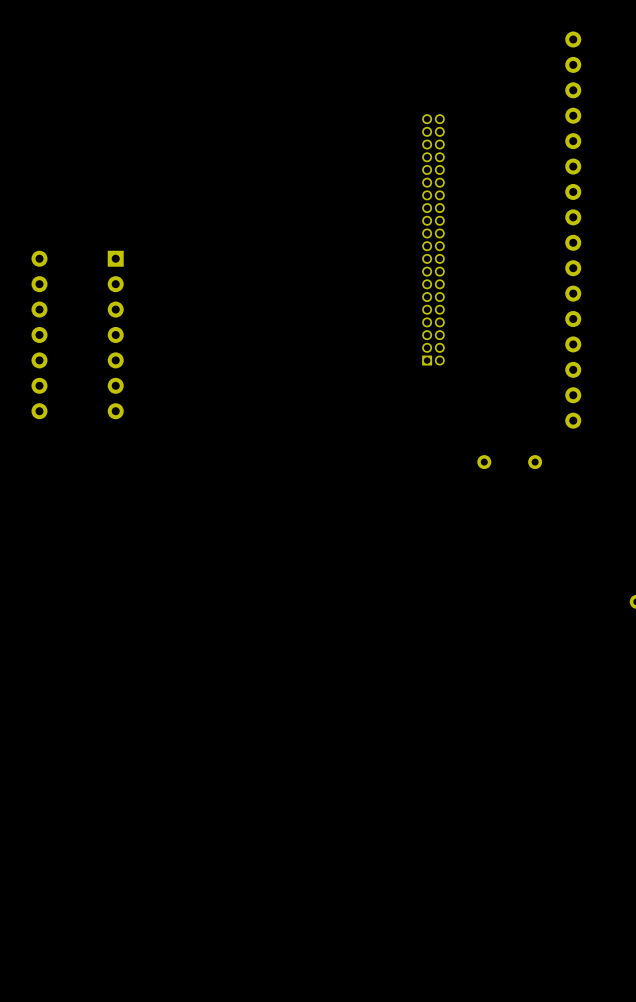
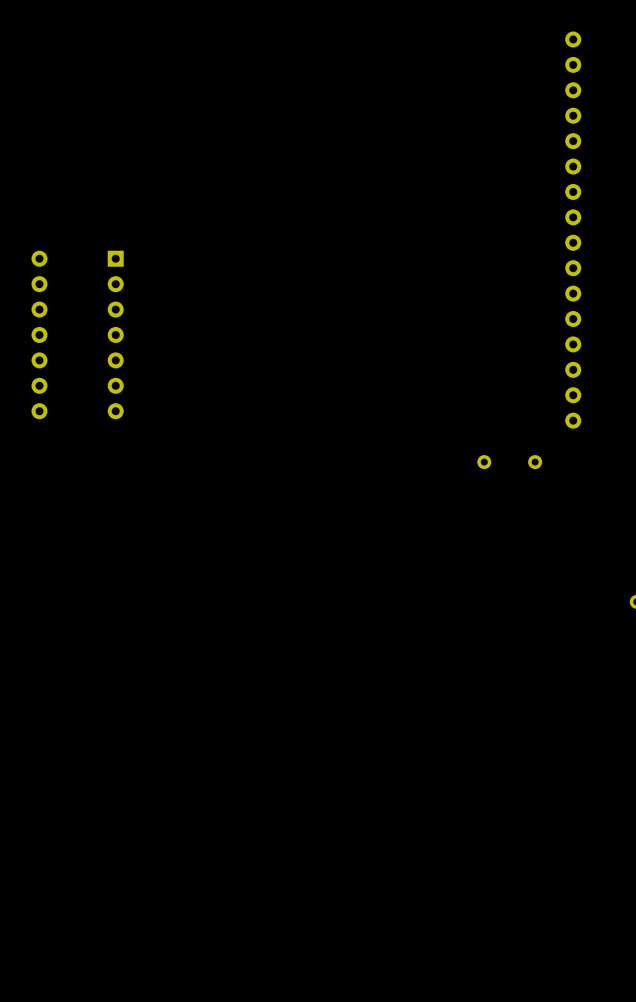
part: (433, 239) -> none

